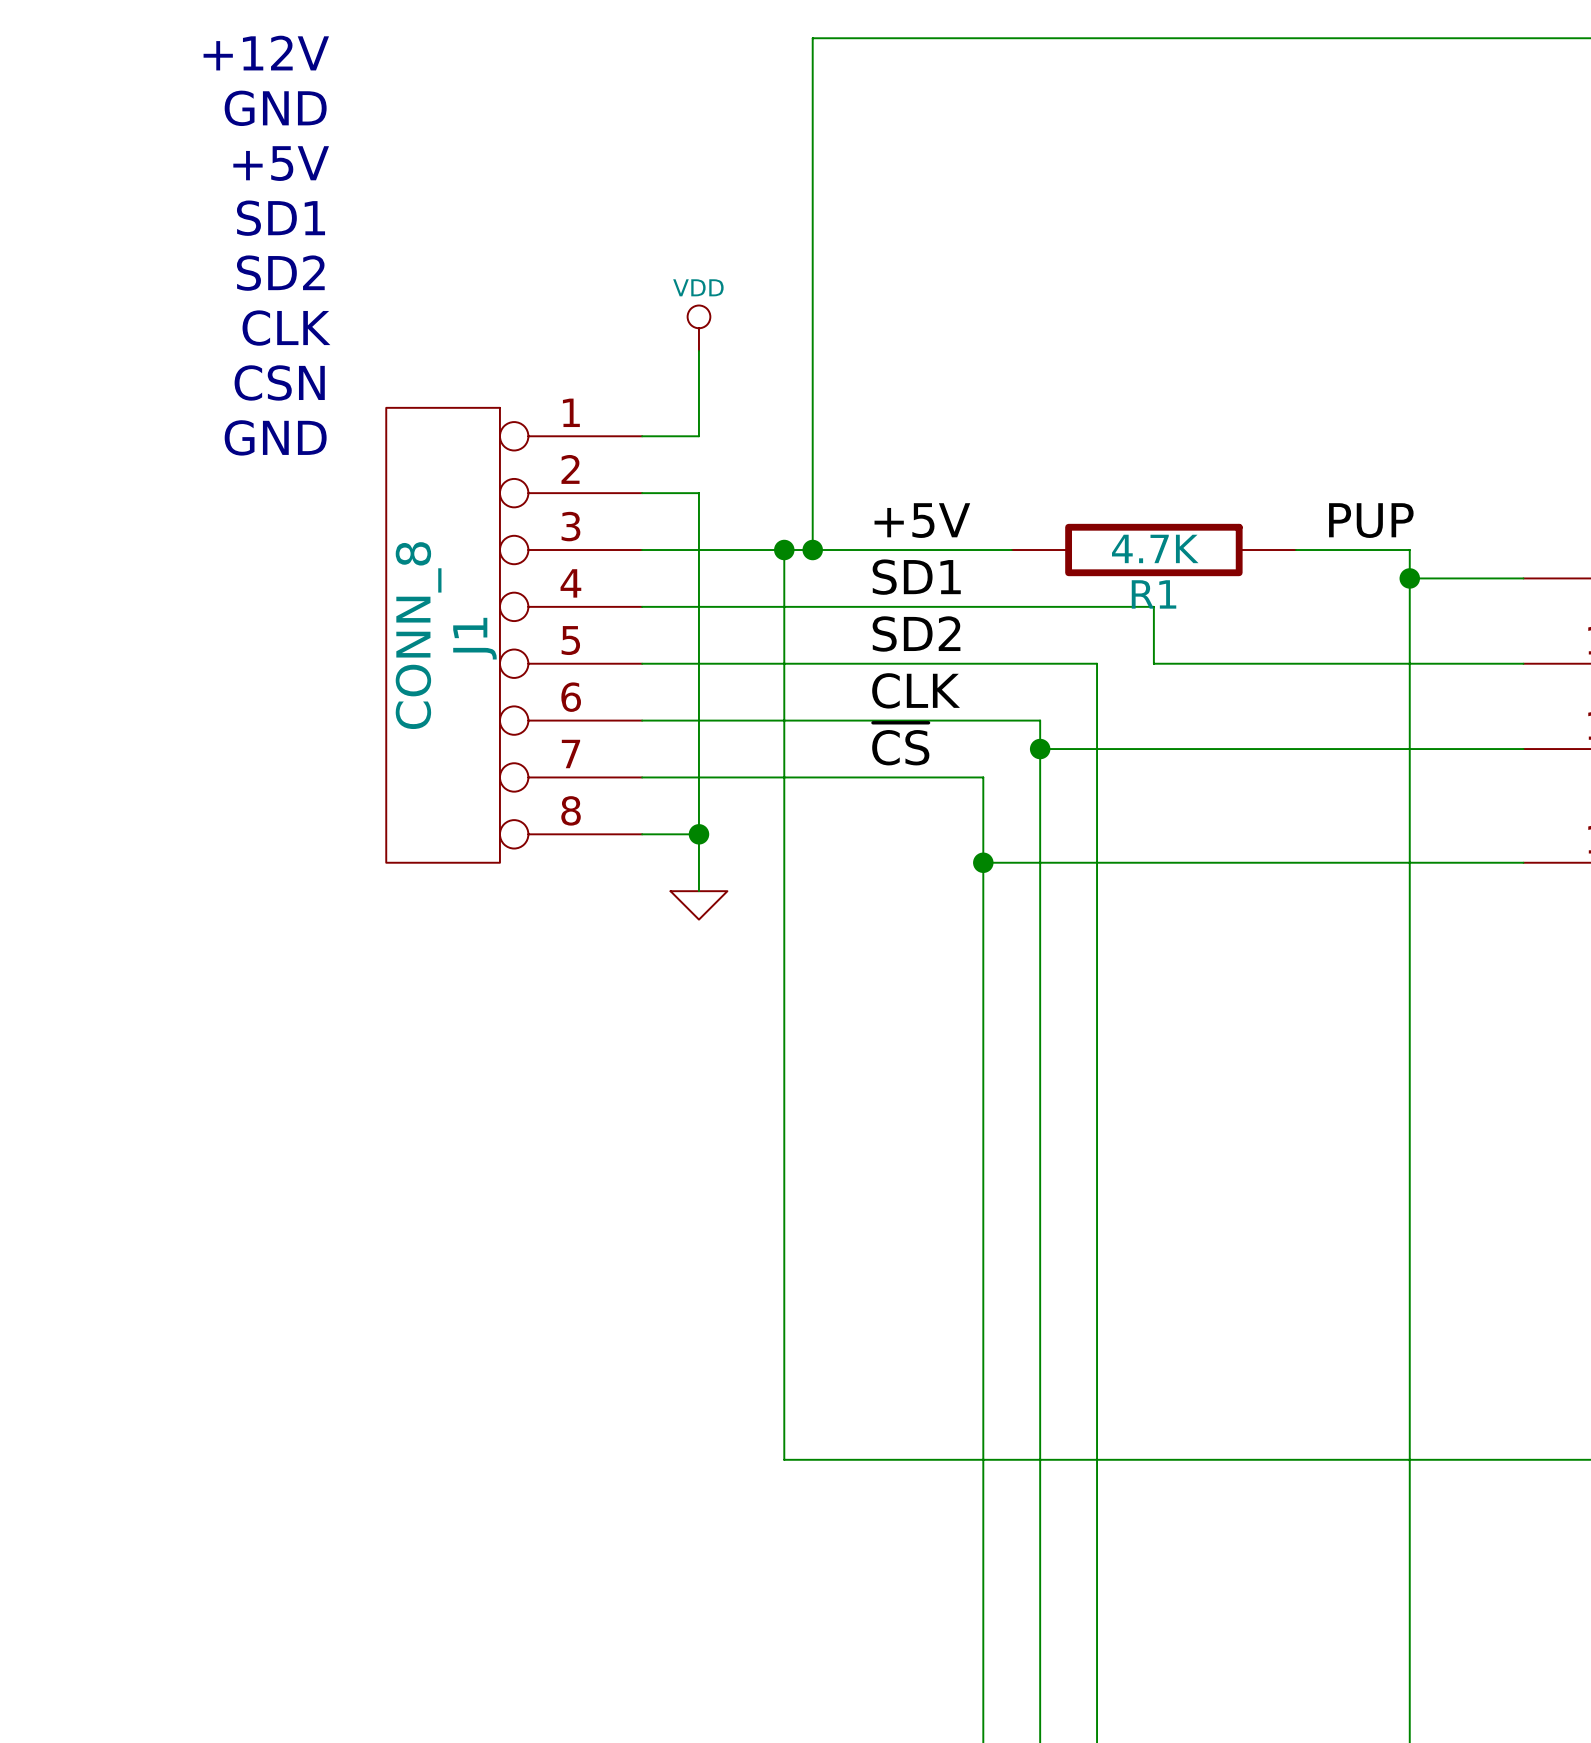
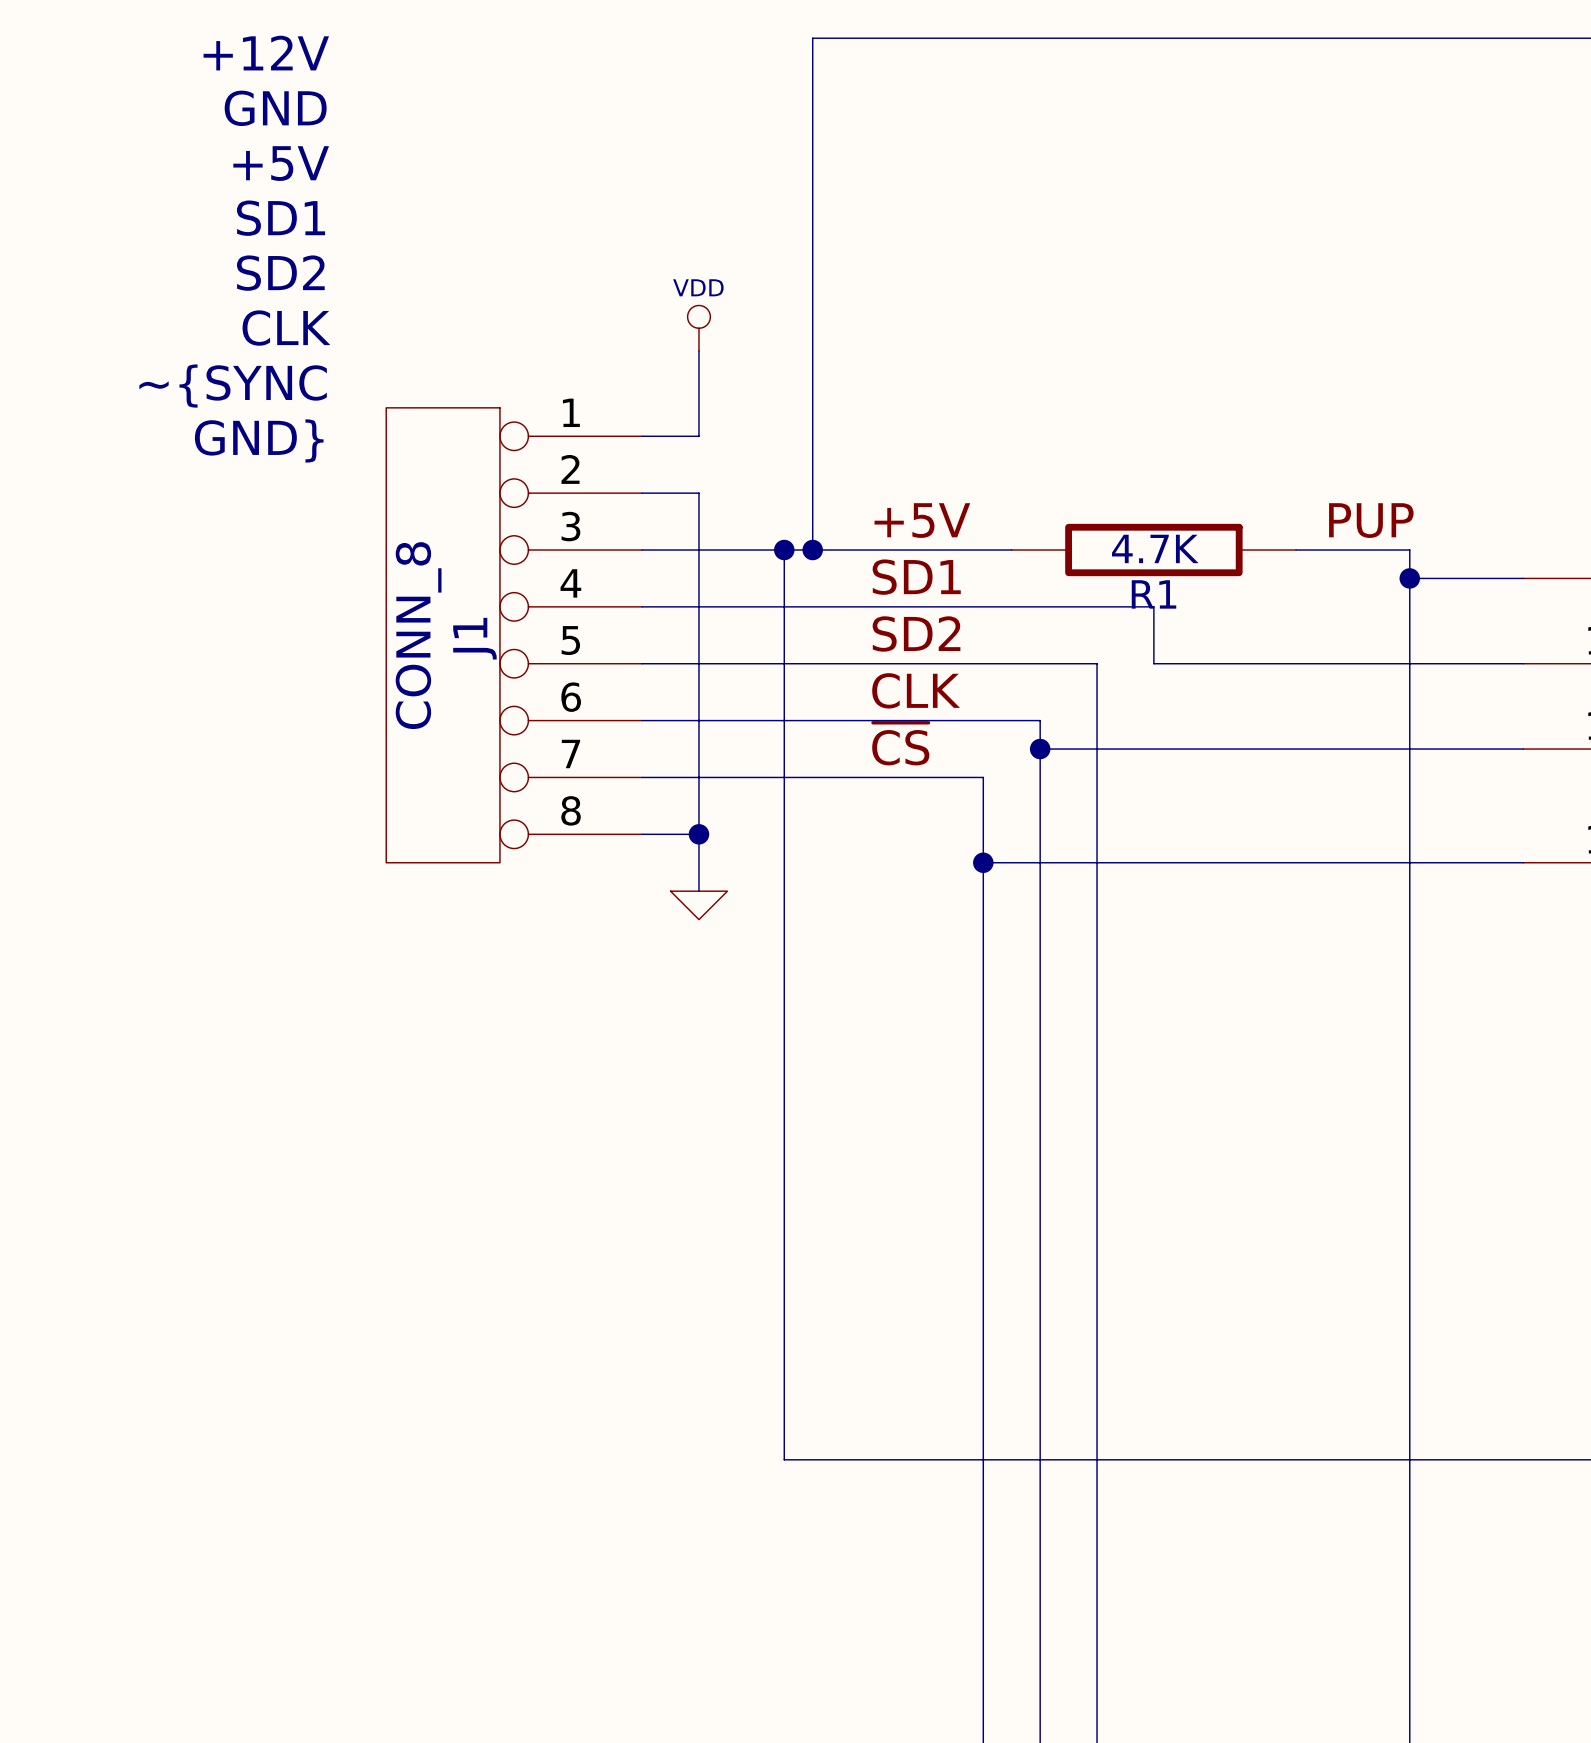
text: CSN (279, 382) -> ~{SYNC (233, 386)
text: GND (275, 437) -> GND} (259, 440)

